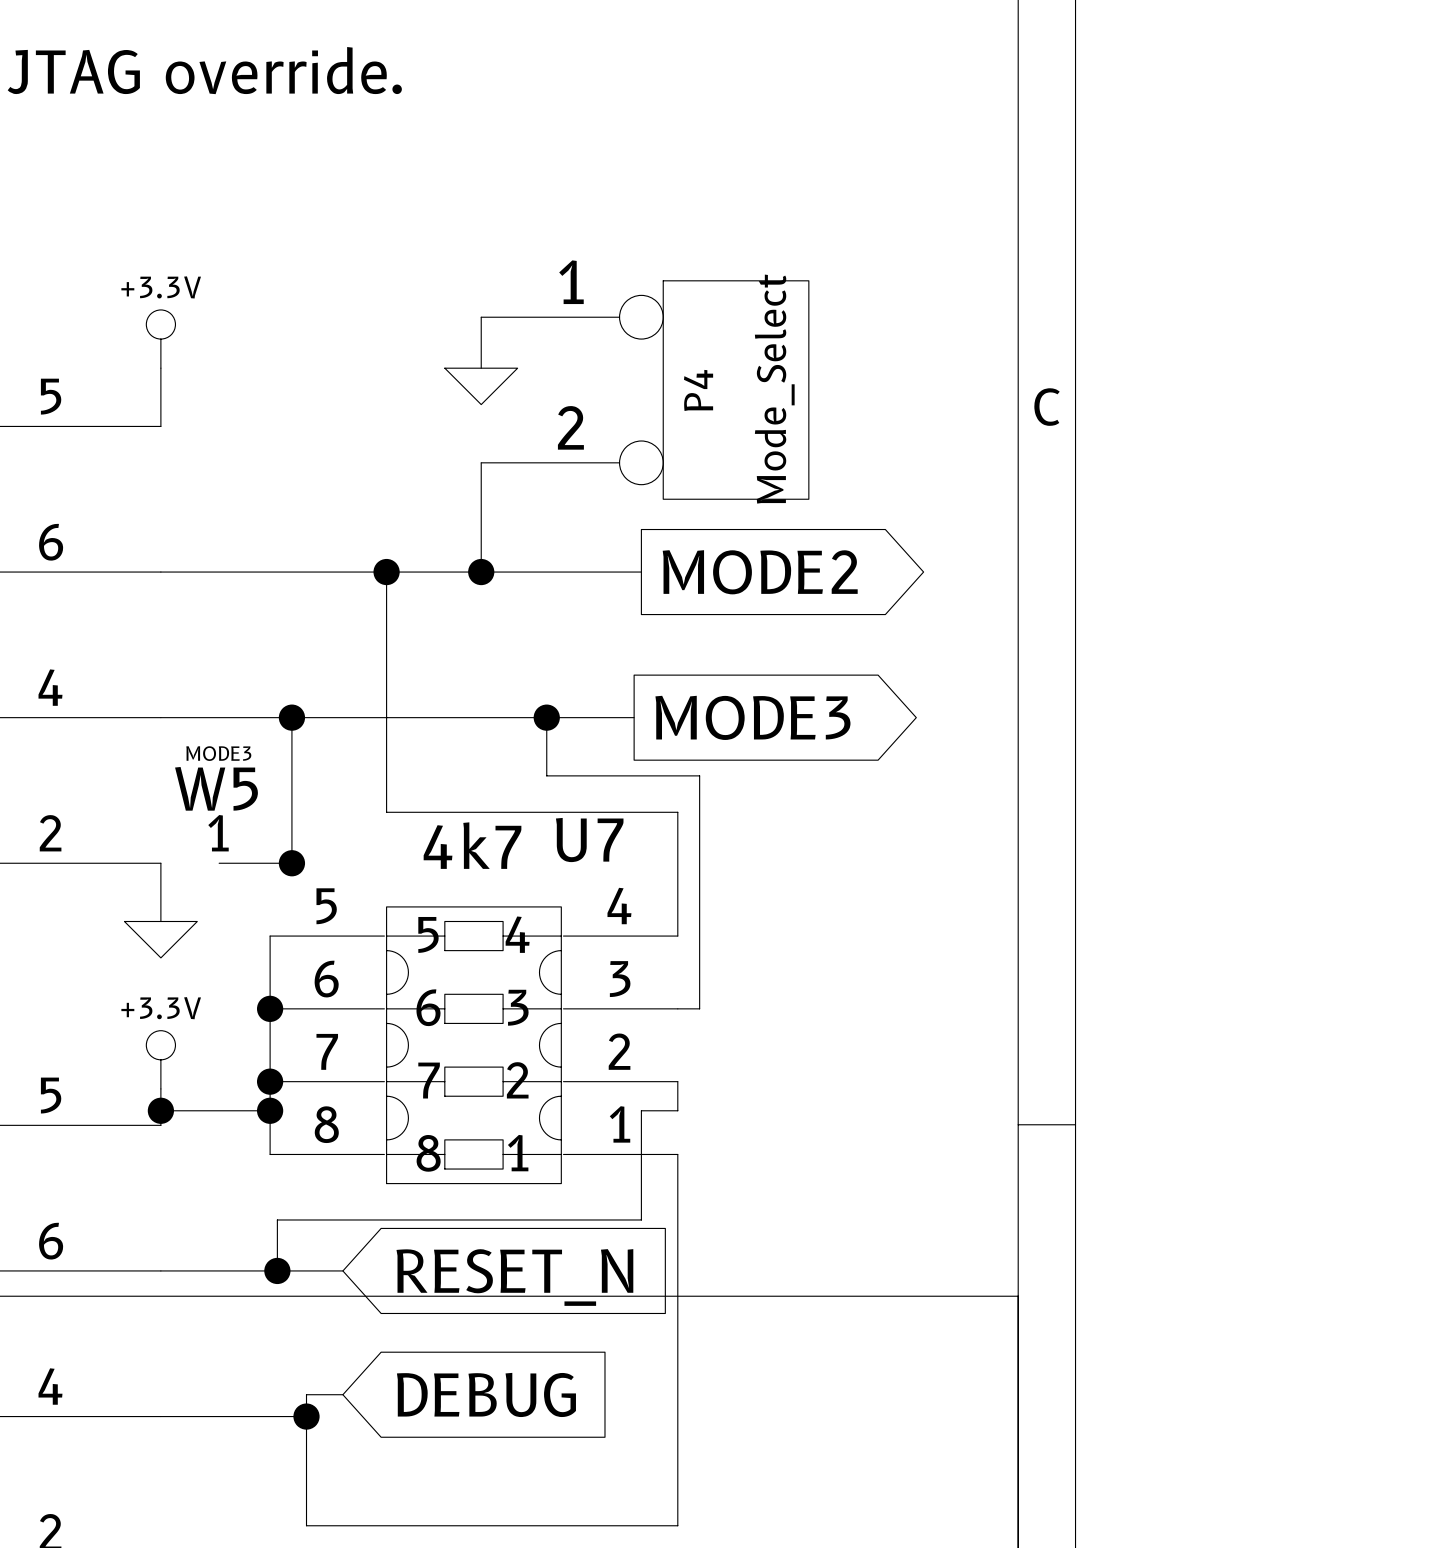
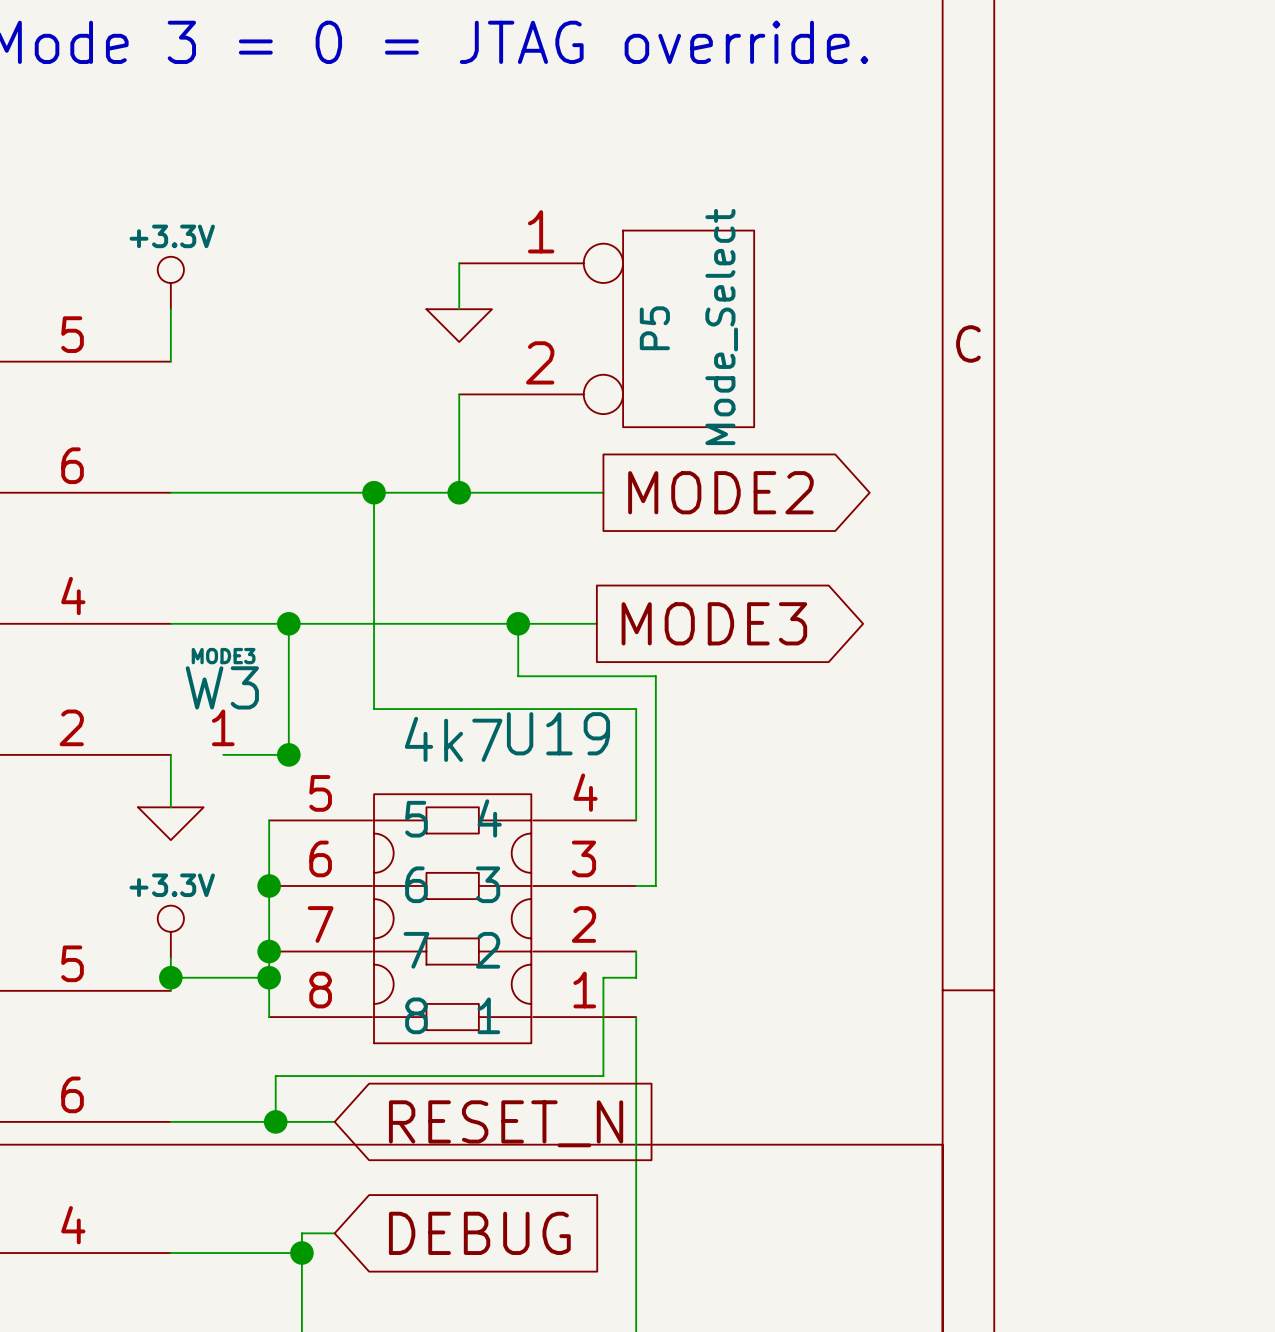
P4 name: P4 (698, 390) -> P5 (654, 328)
W5 name: W5 (216, 788) -> W3 (222, 687)
U7 name: U7 (589, 840) -> U19 (558, 733)

